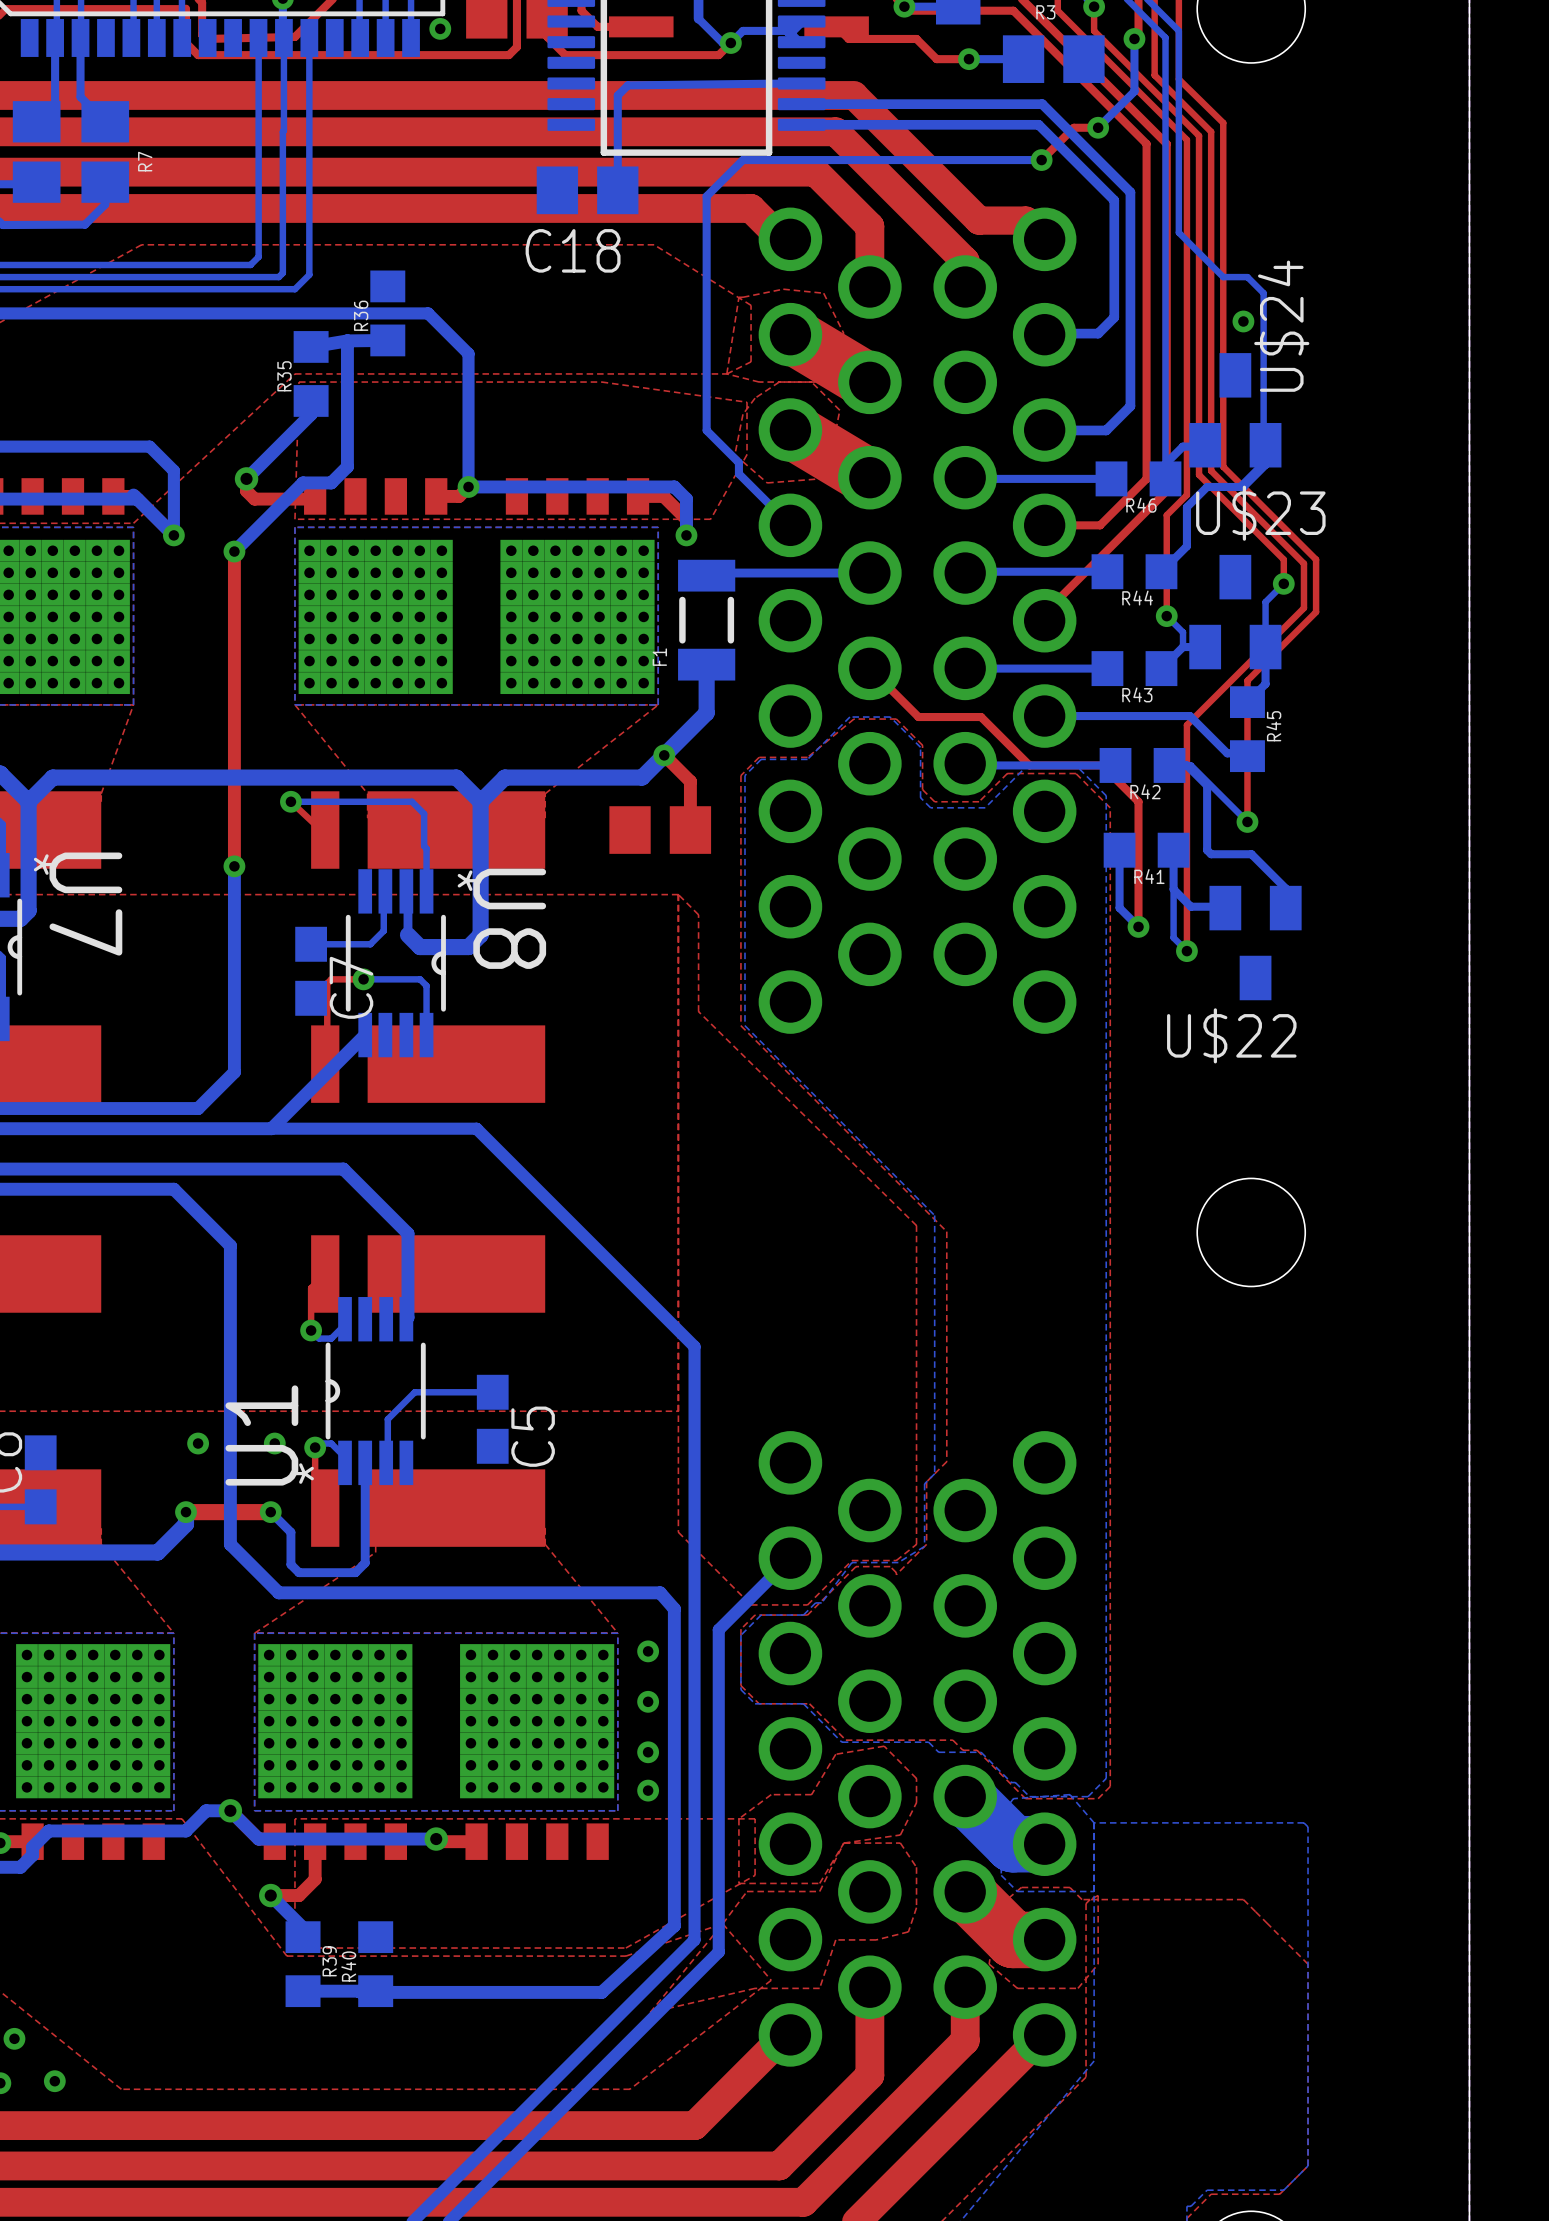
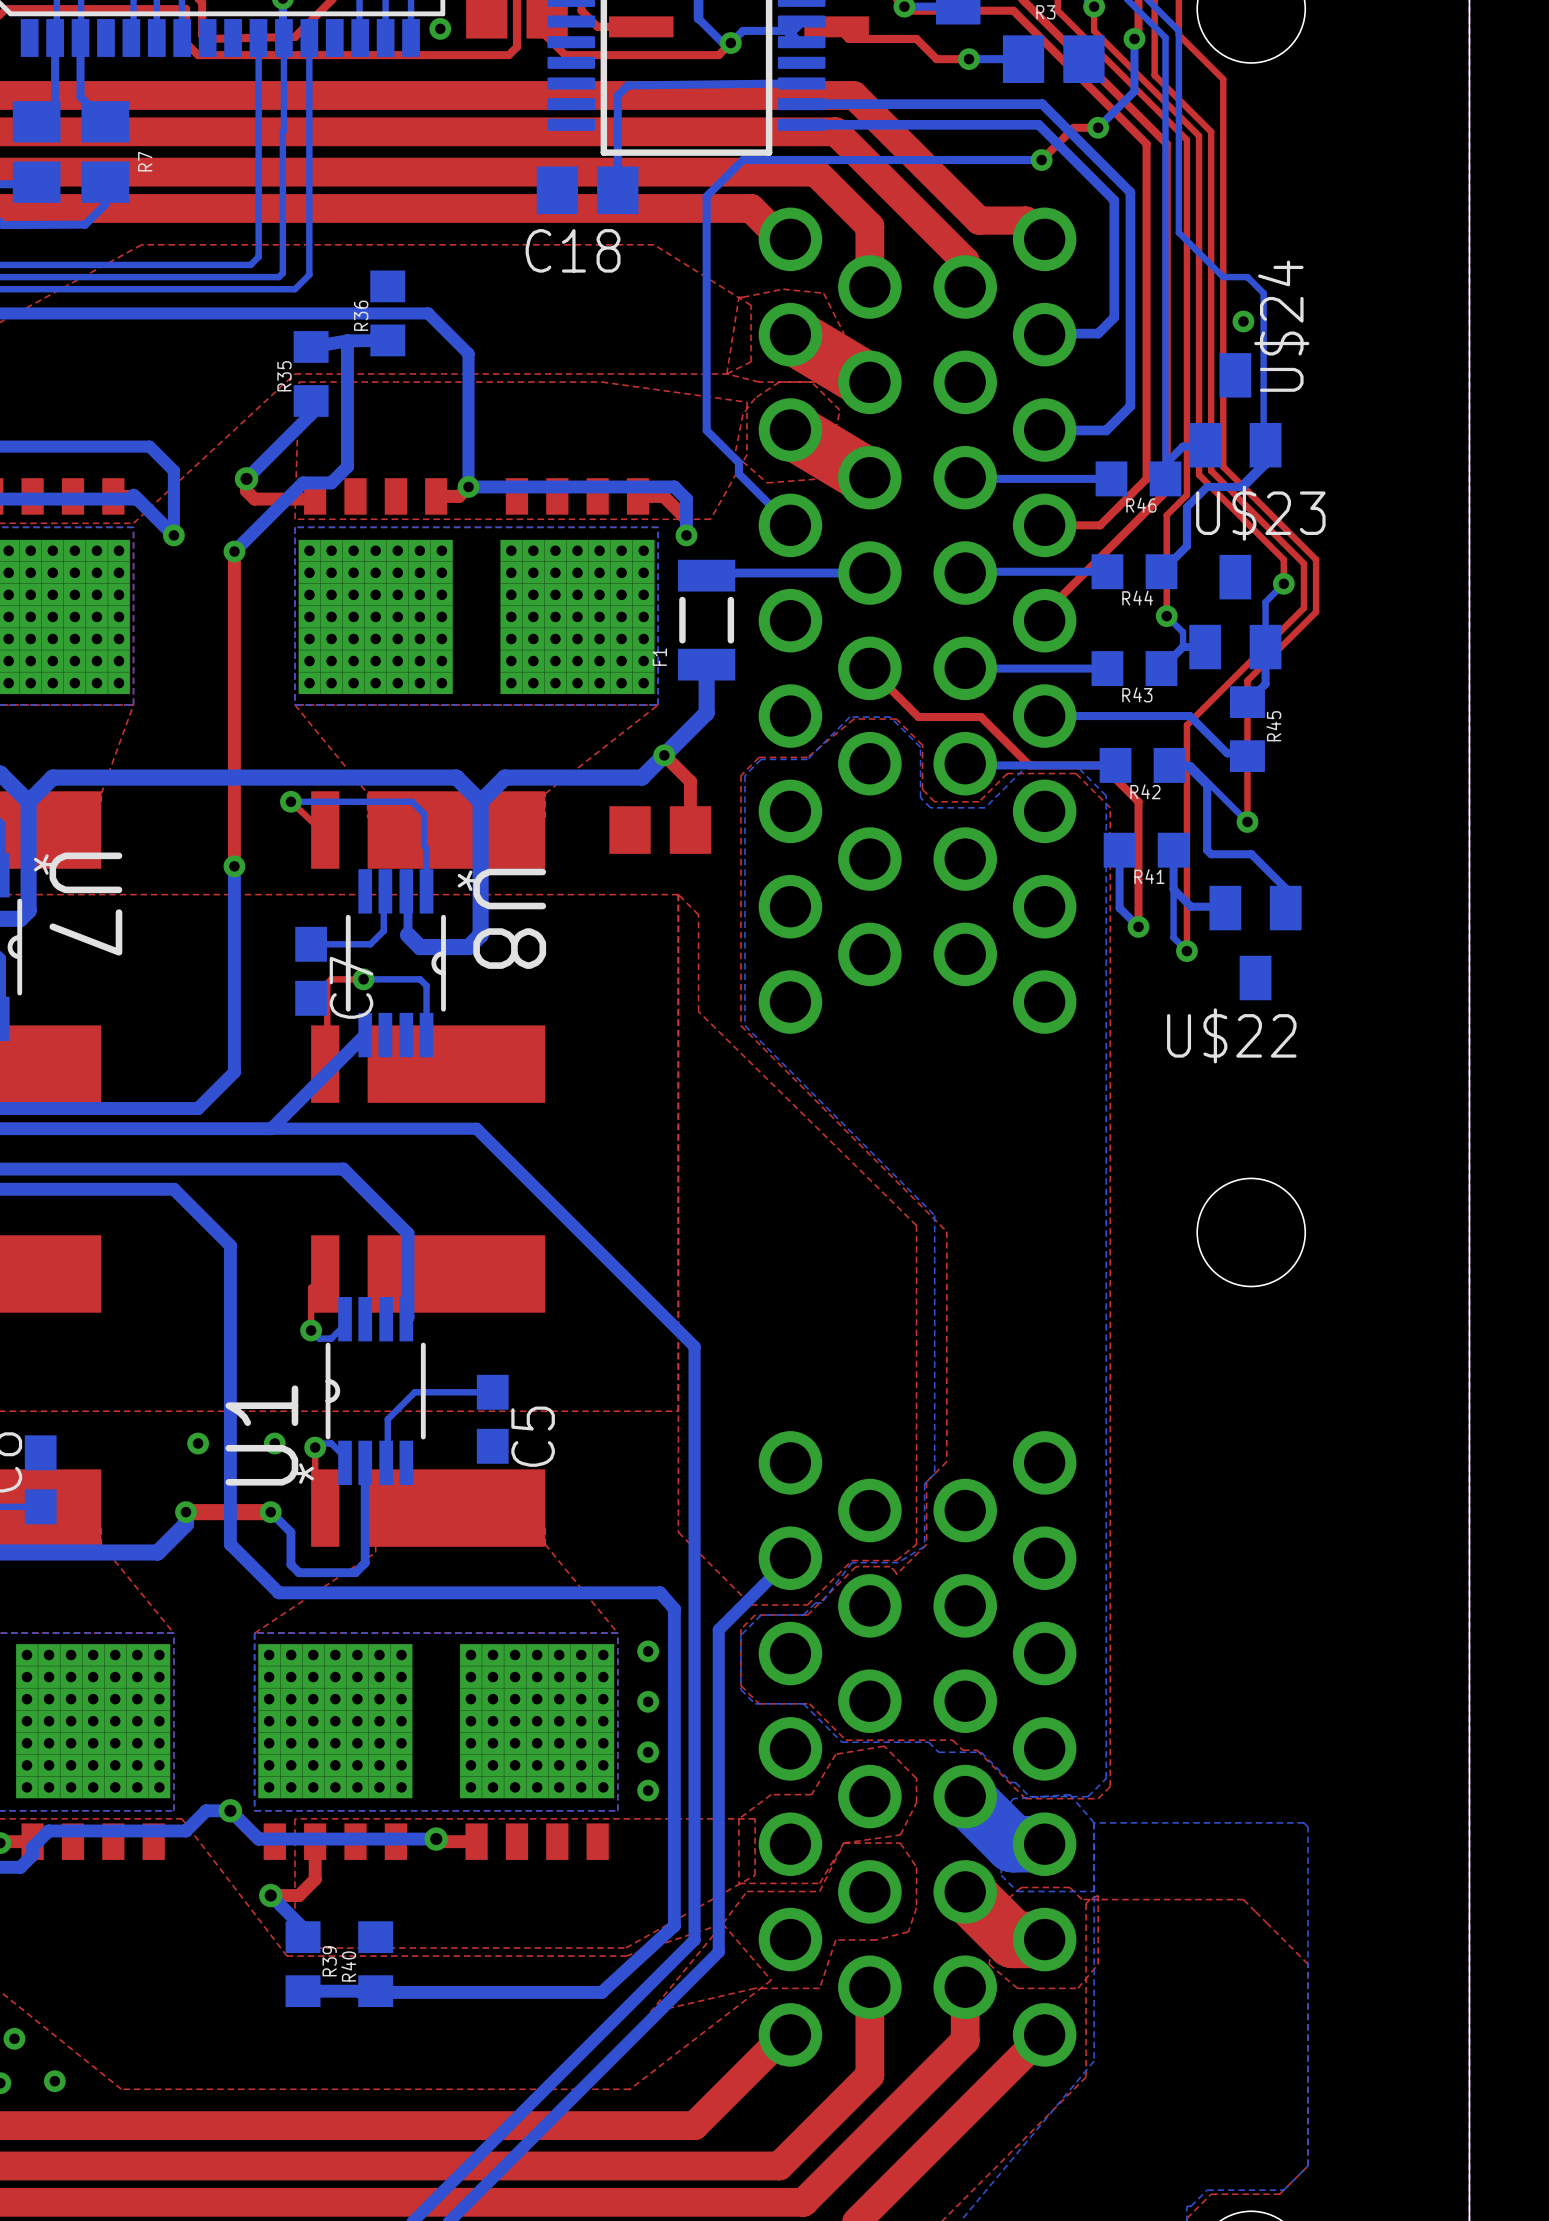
top track: (1178, 34) (1178, 79) (1223, 122) -> (1178, 34) (1223, 79) (1223, 122)

